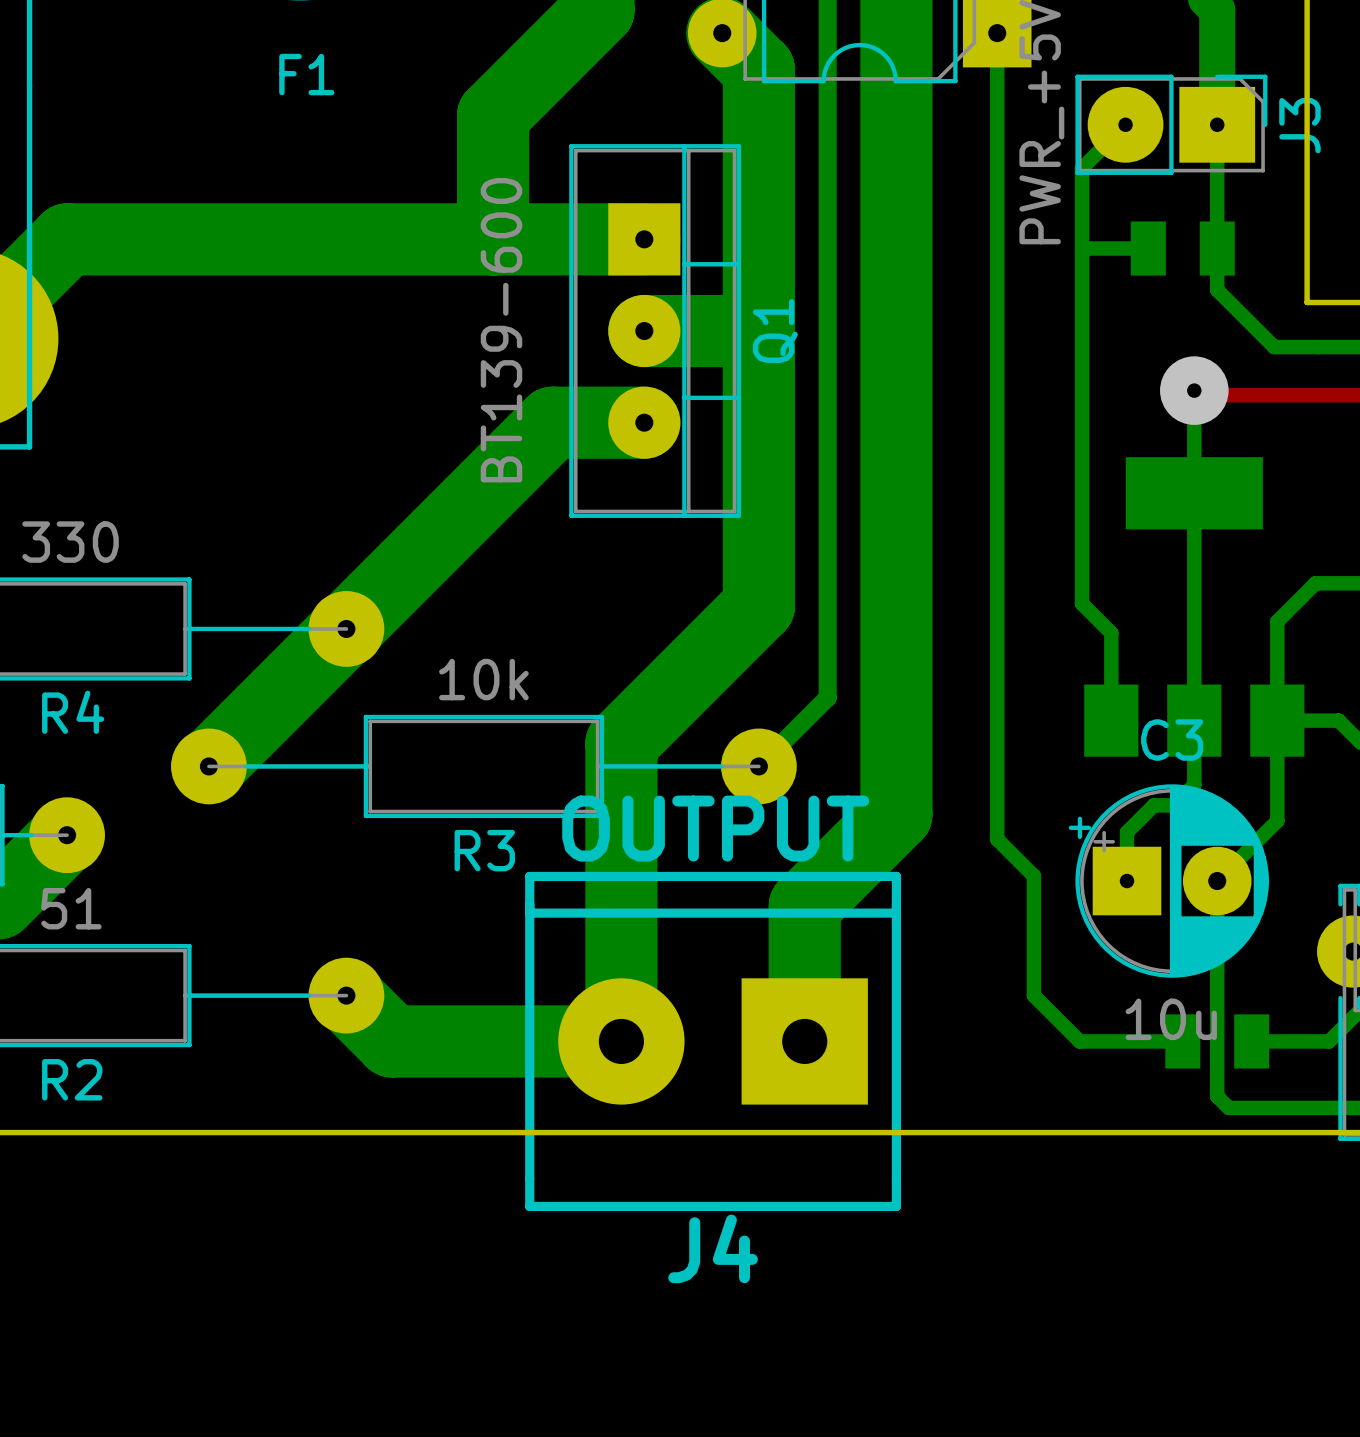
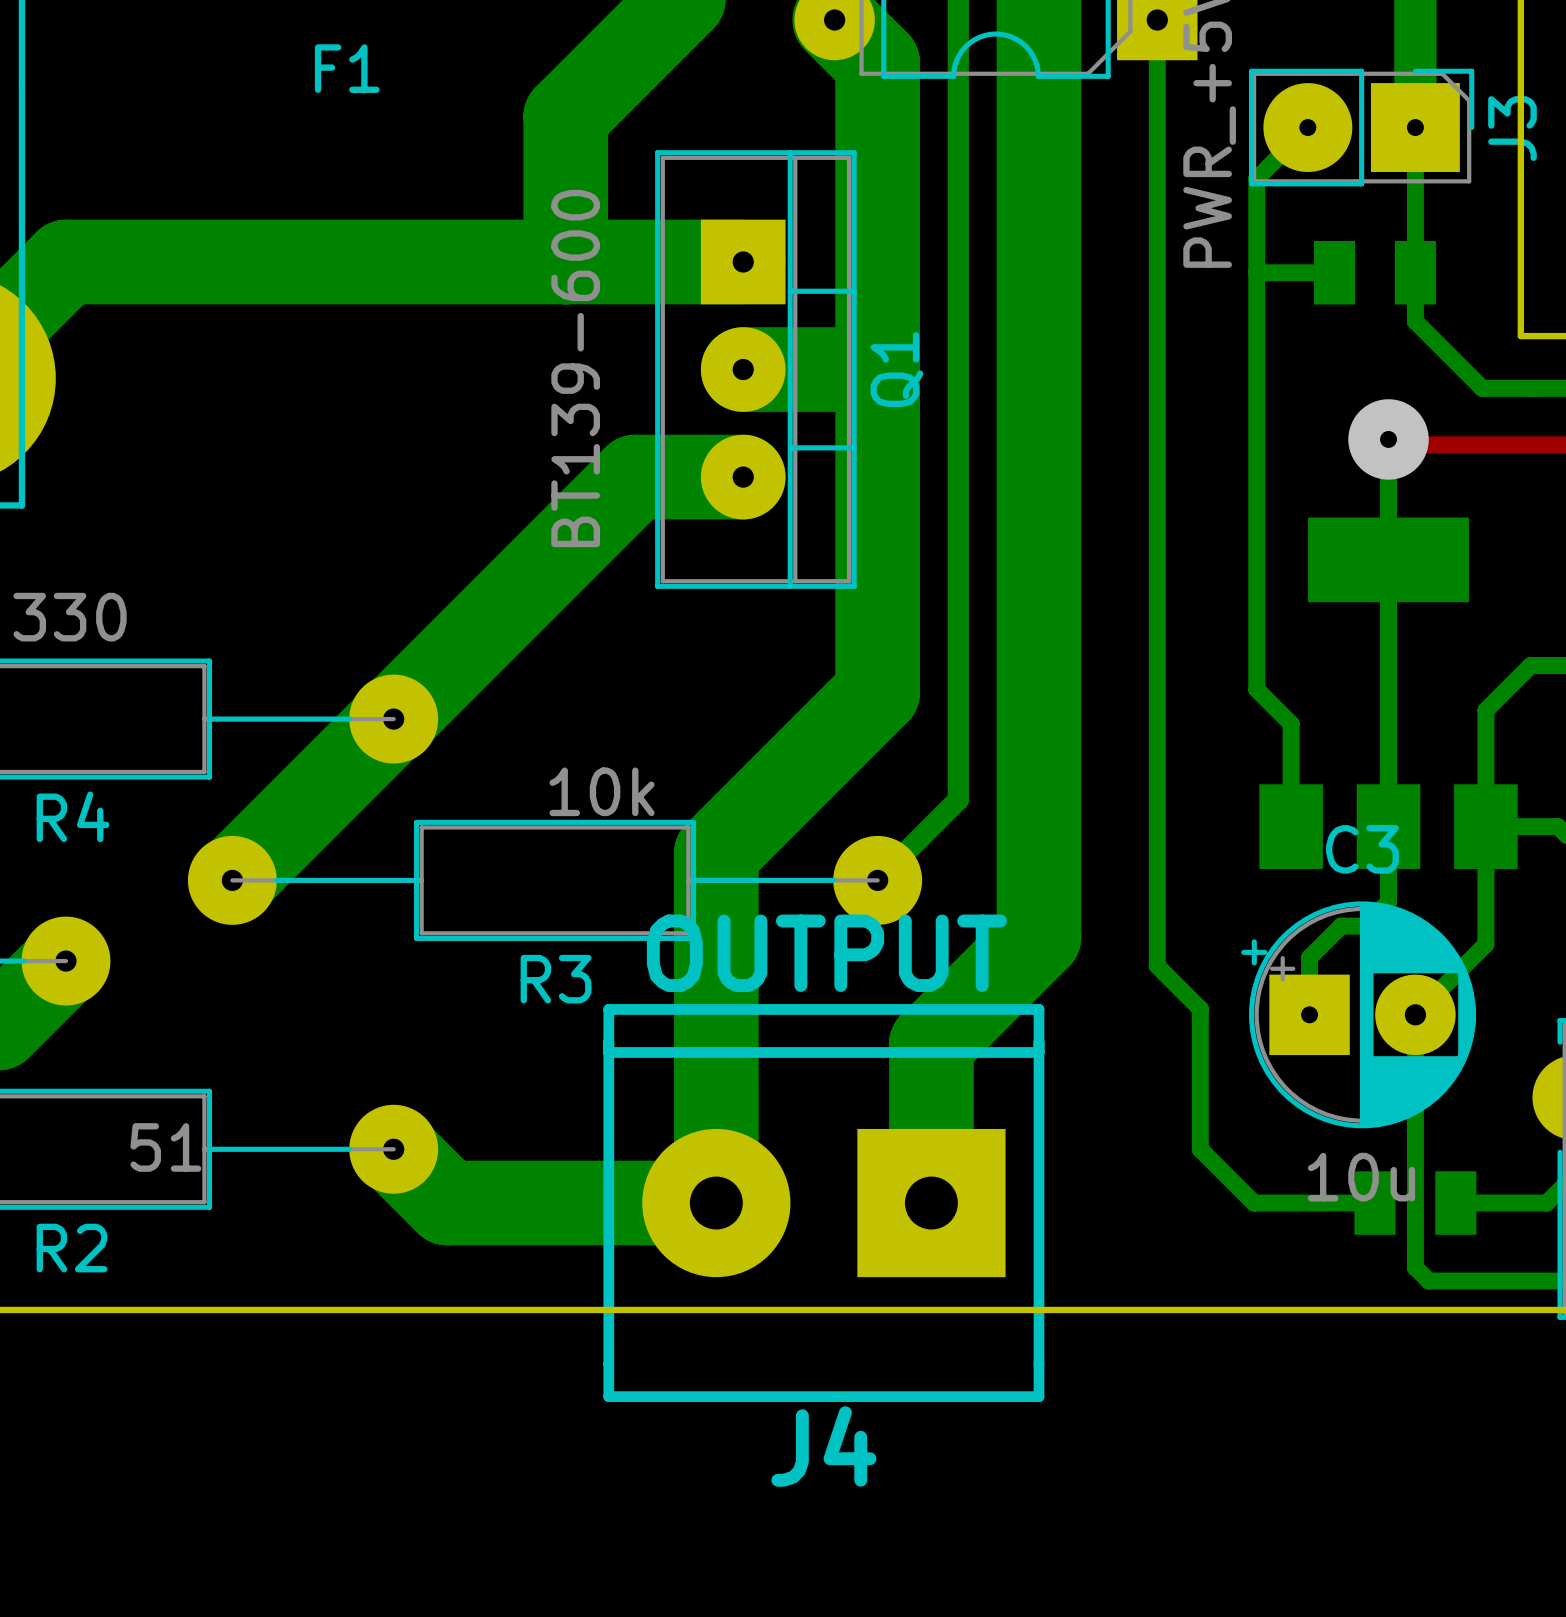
R3 value position: 10k (483, 679) -> 10k (602, 791)
R2 value position: 51 (71, 908) -> 51 (165, 1147)

